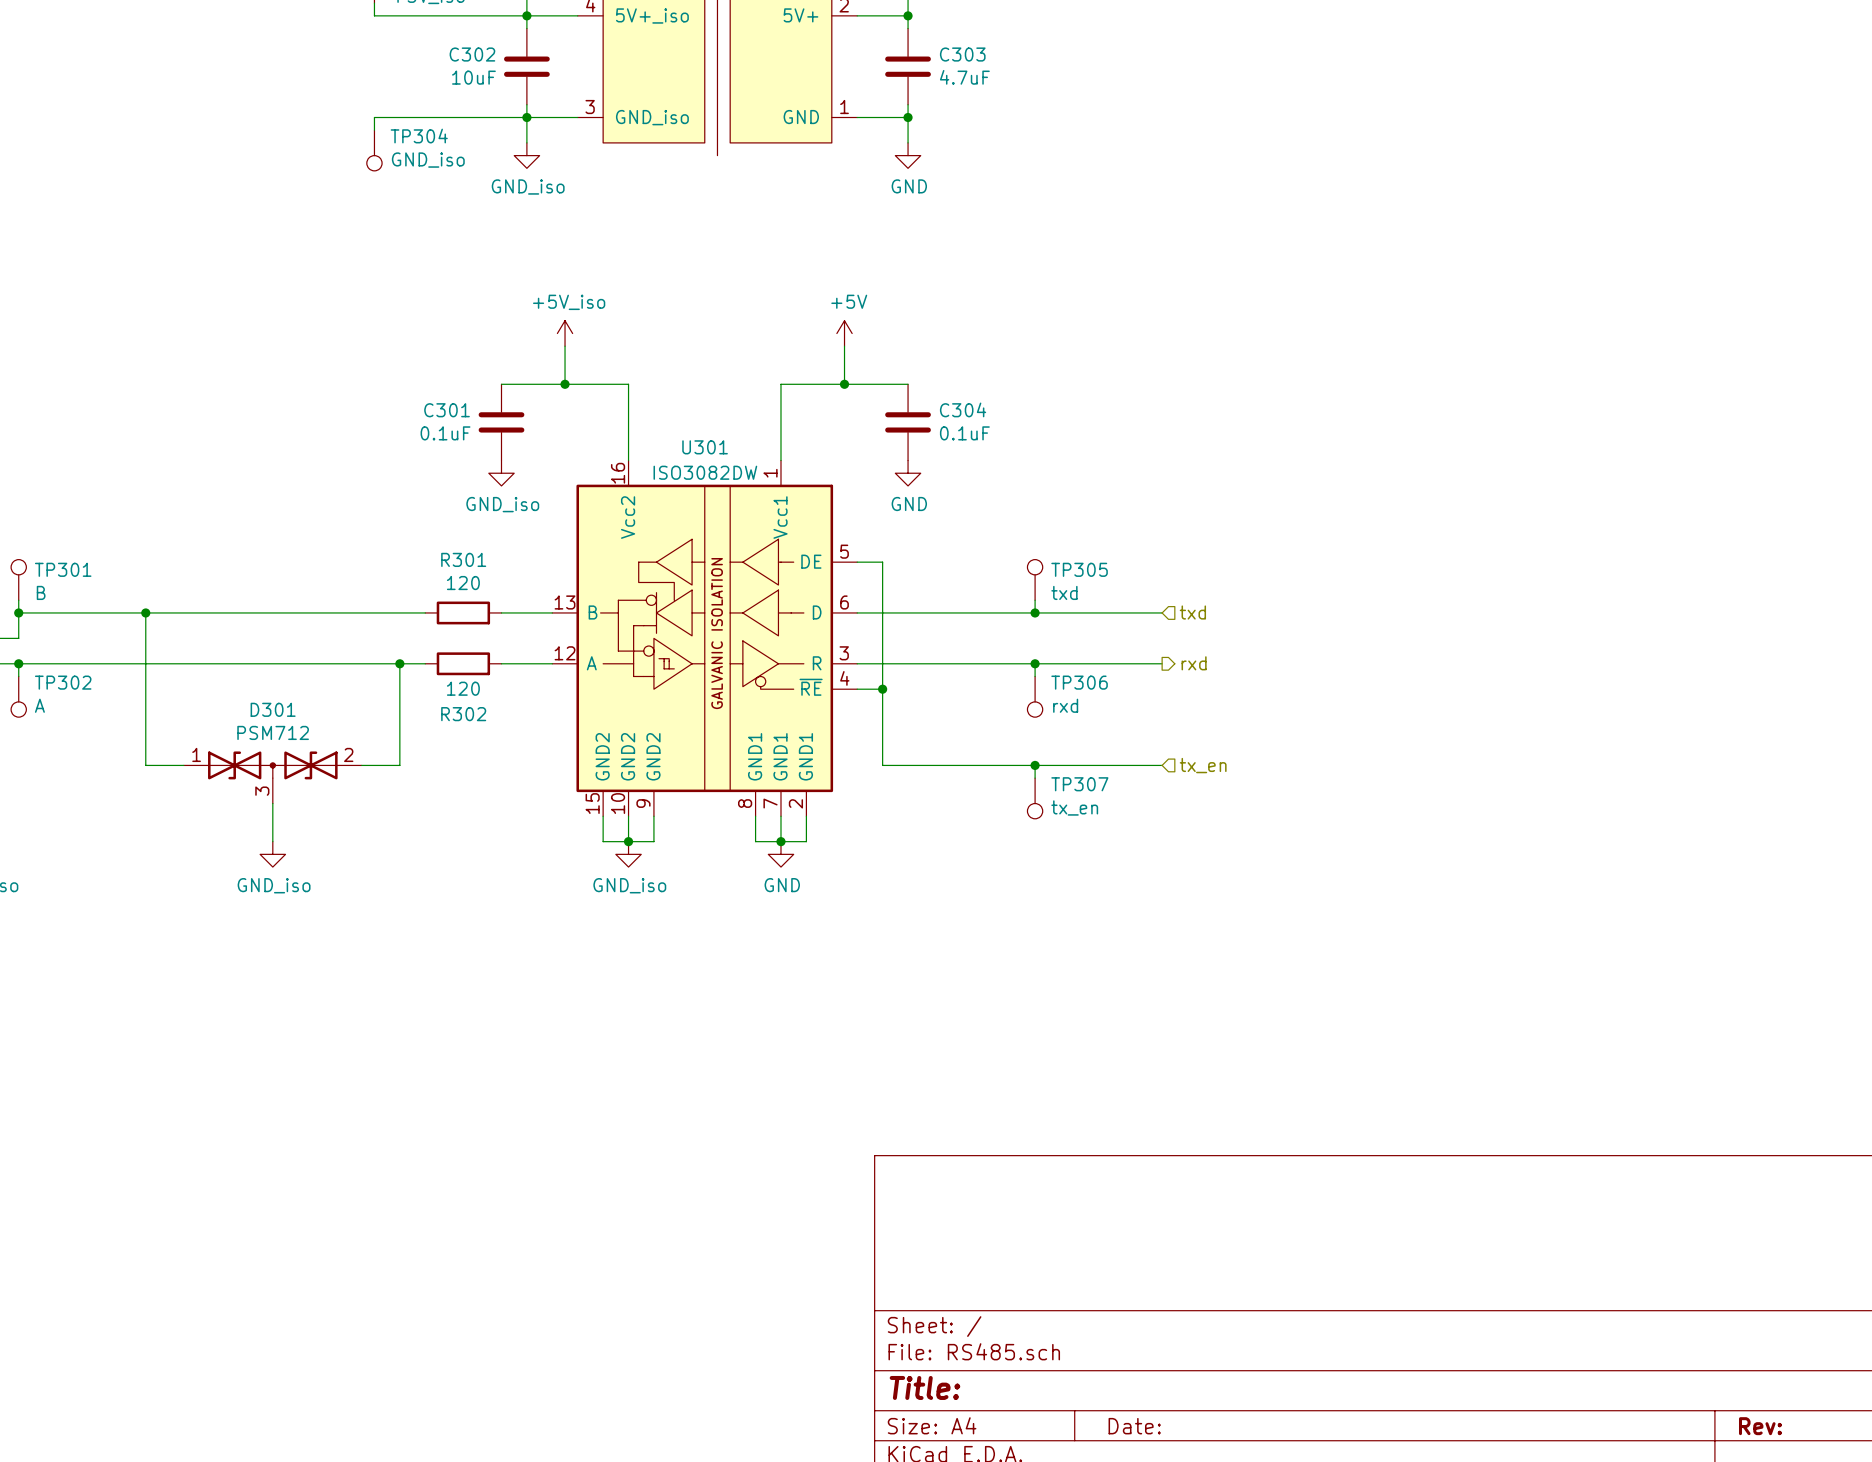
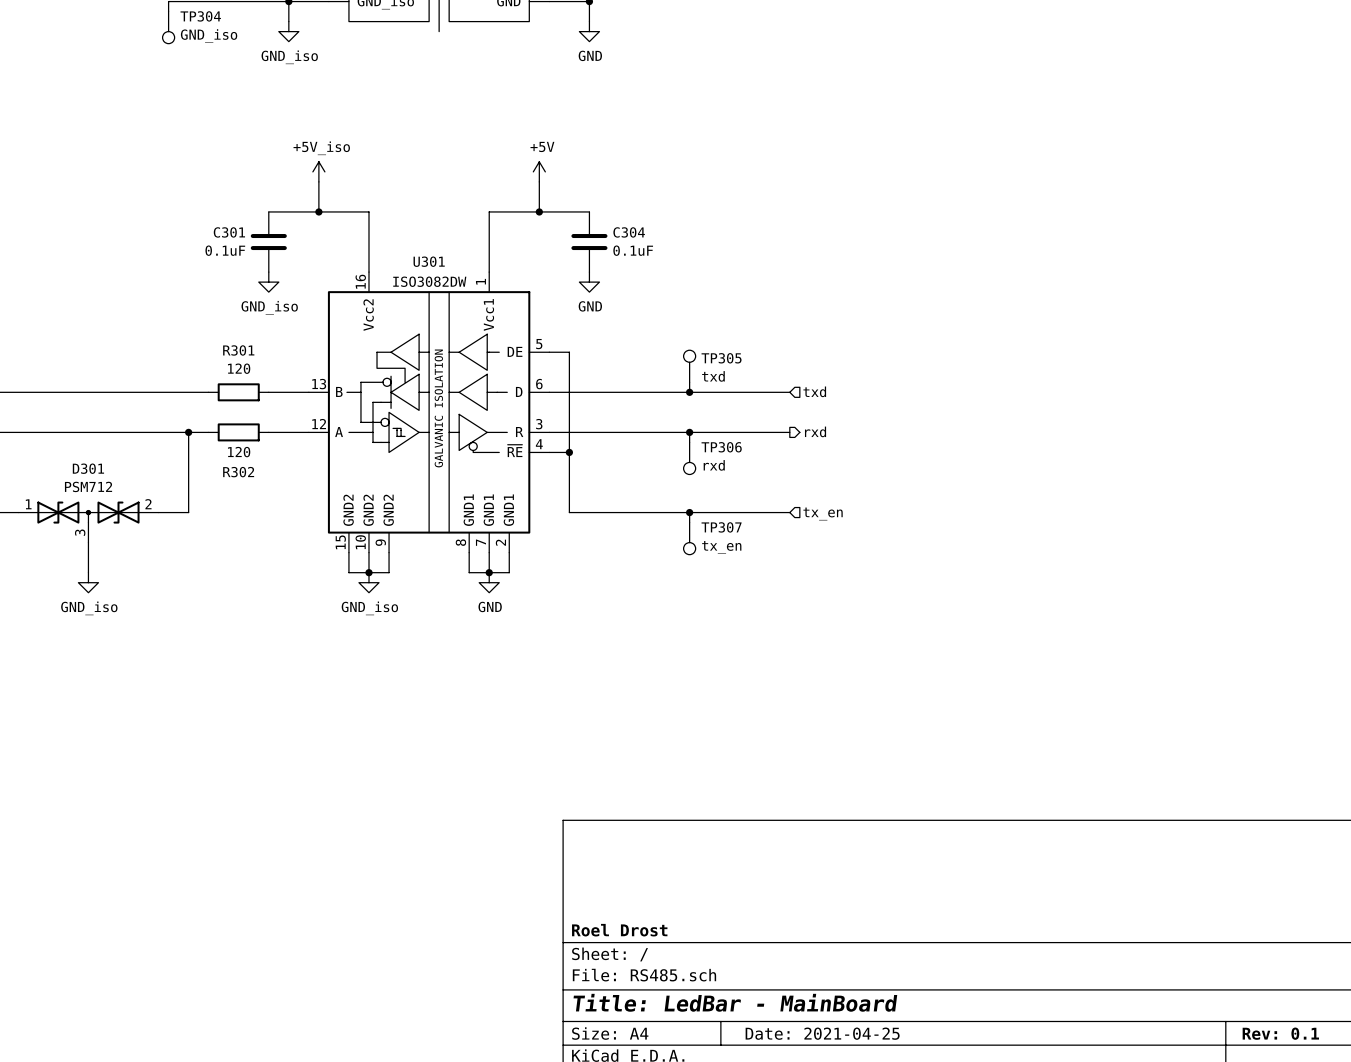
title block: none -> Roel Drost (619, 930)
title block: Title: (924, 1387) -> Title: LedBar - MainBoard (735, 1002)
title block: Date: (1134, 1426) -> Date: 2021-04-25 (822, 1033)
title block: Rev: (1760, 1426) -> Rev: 0.1 (1280, 1033)

